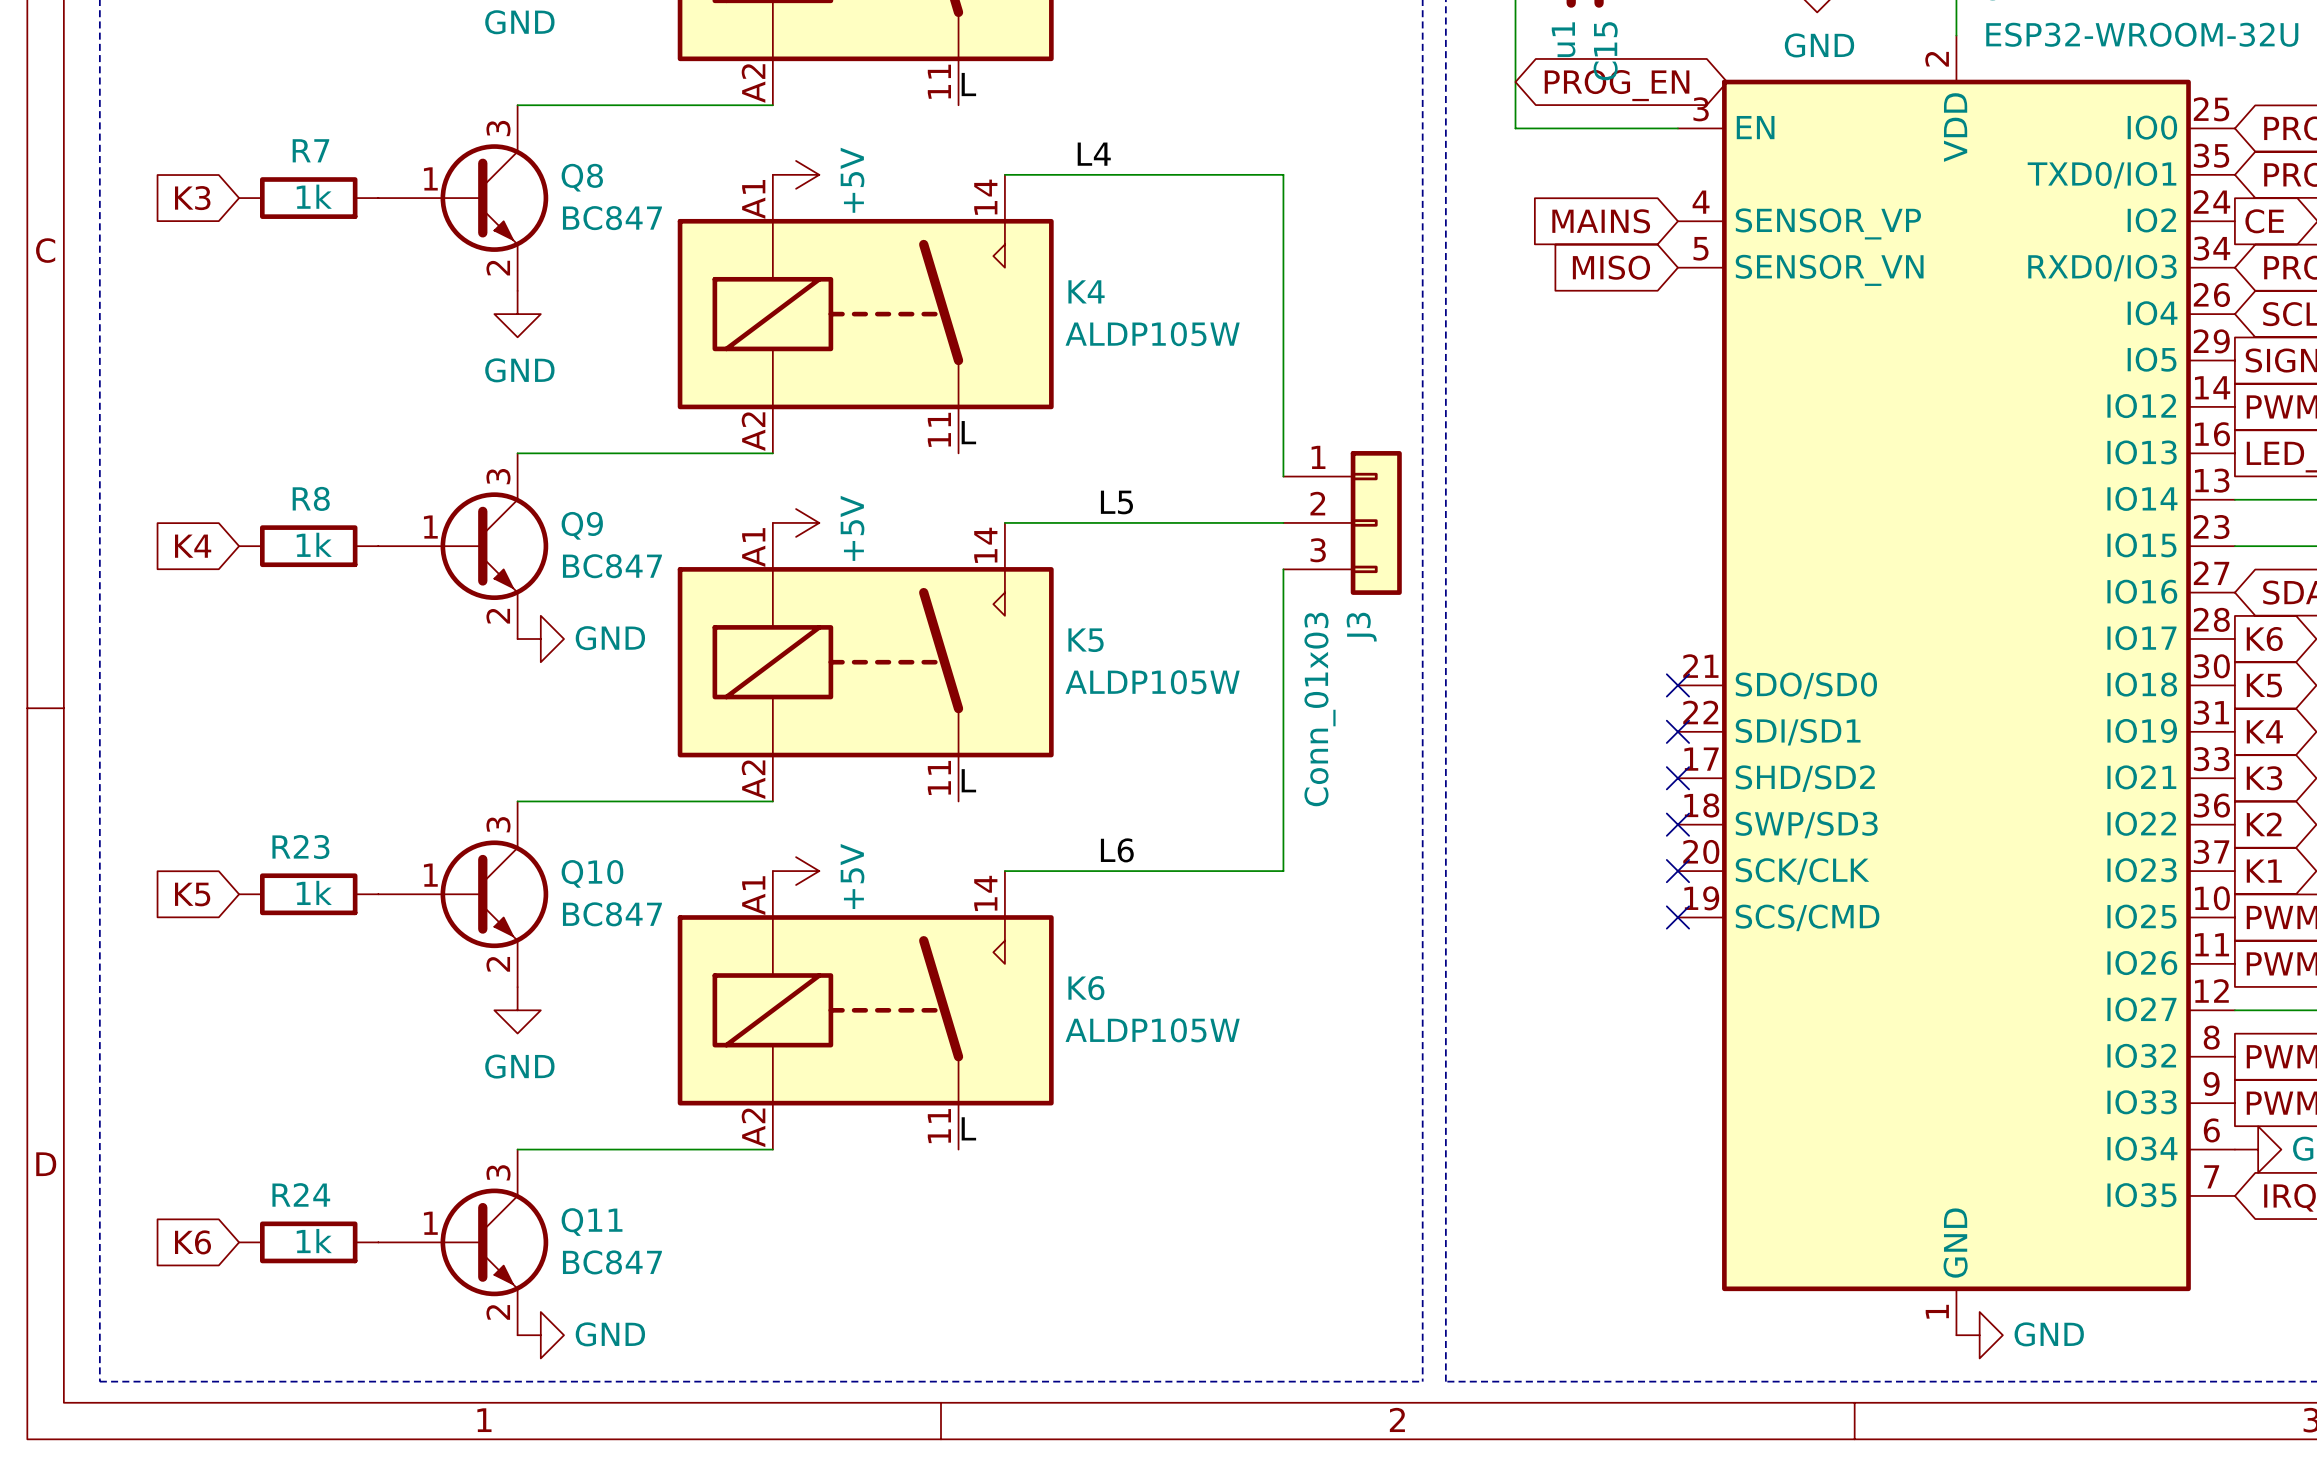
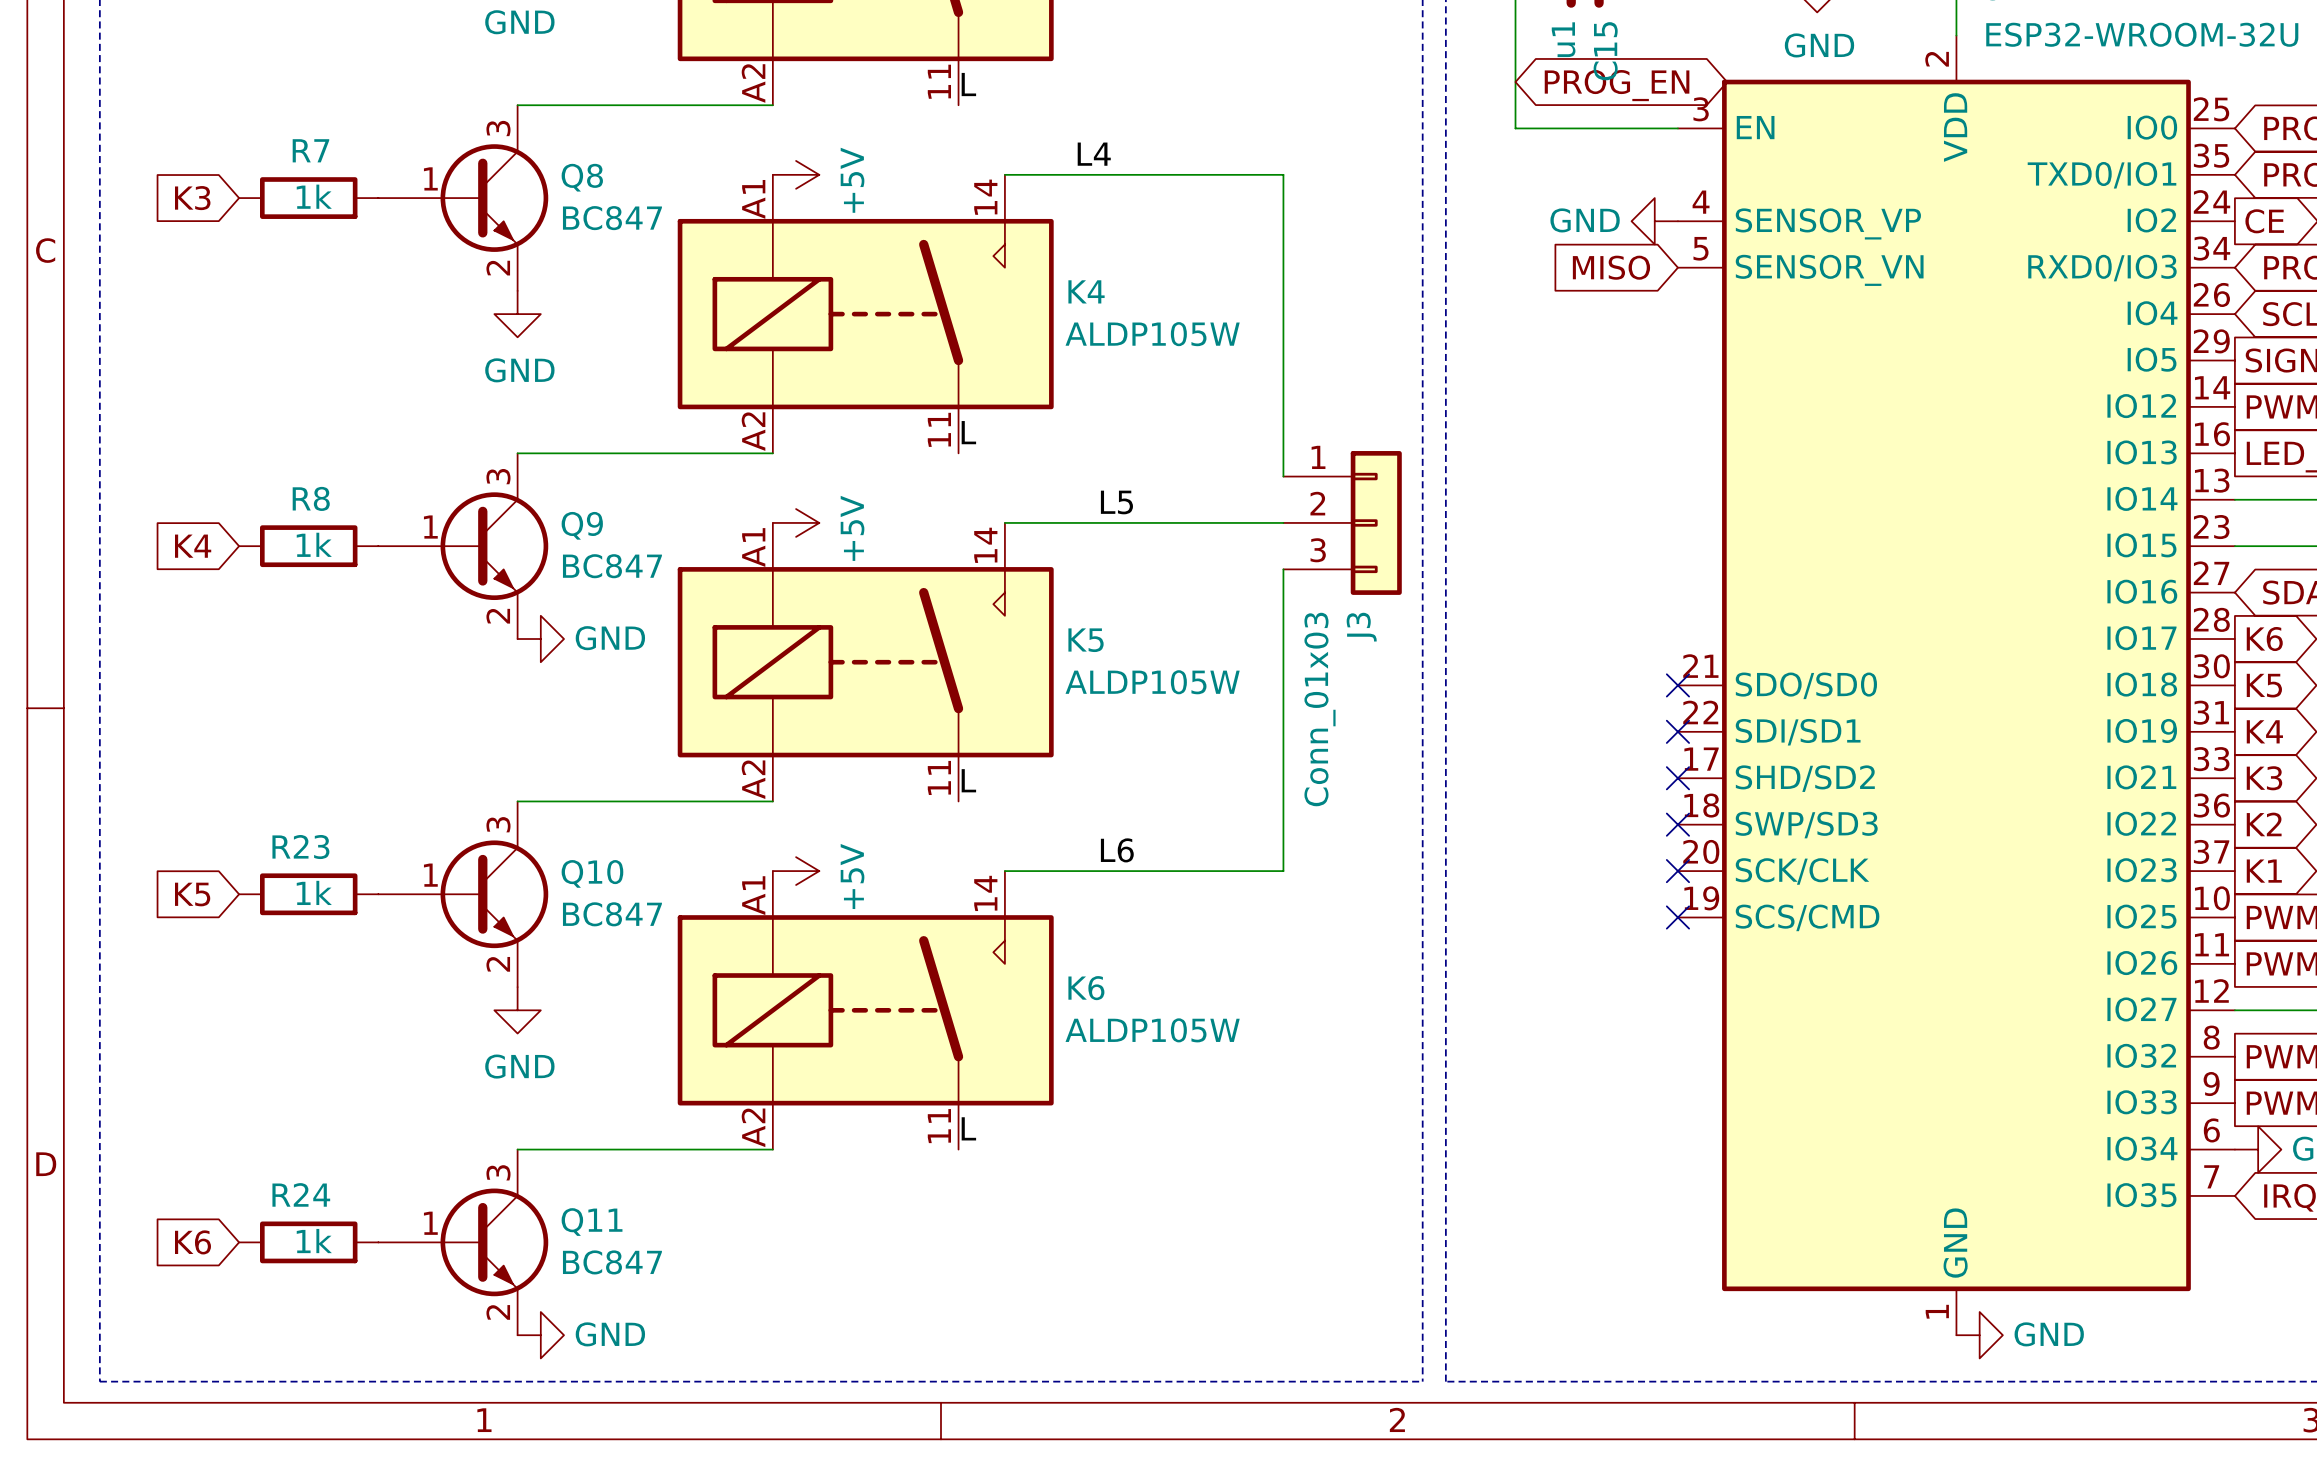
global label: MAINS (1601, 221) -> none
power symbol: none -> GND (1654, 221)

